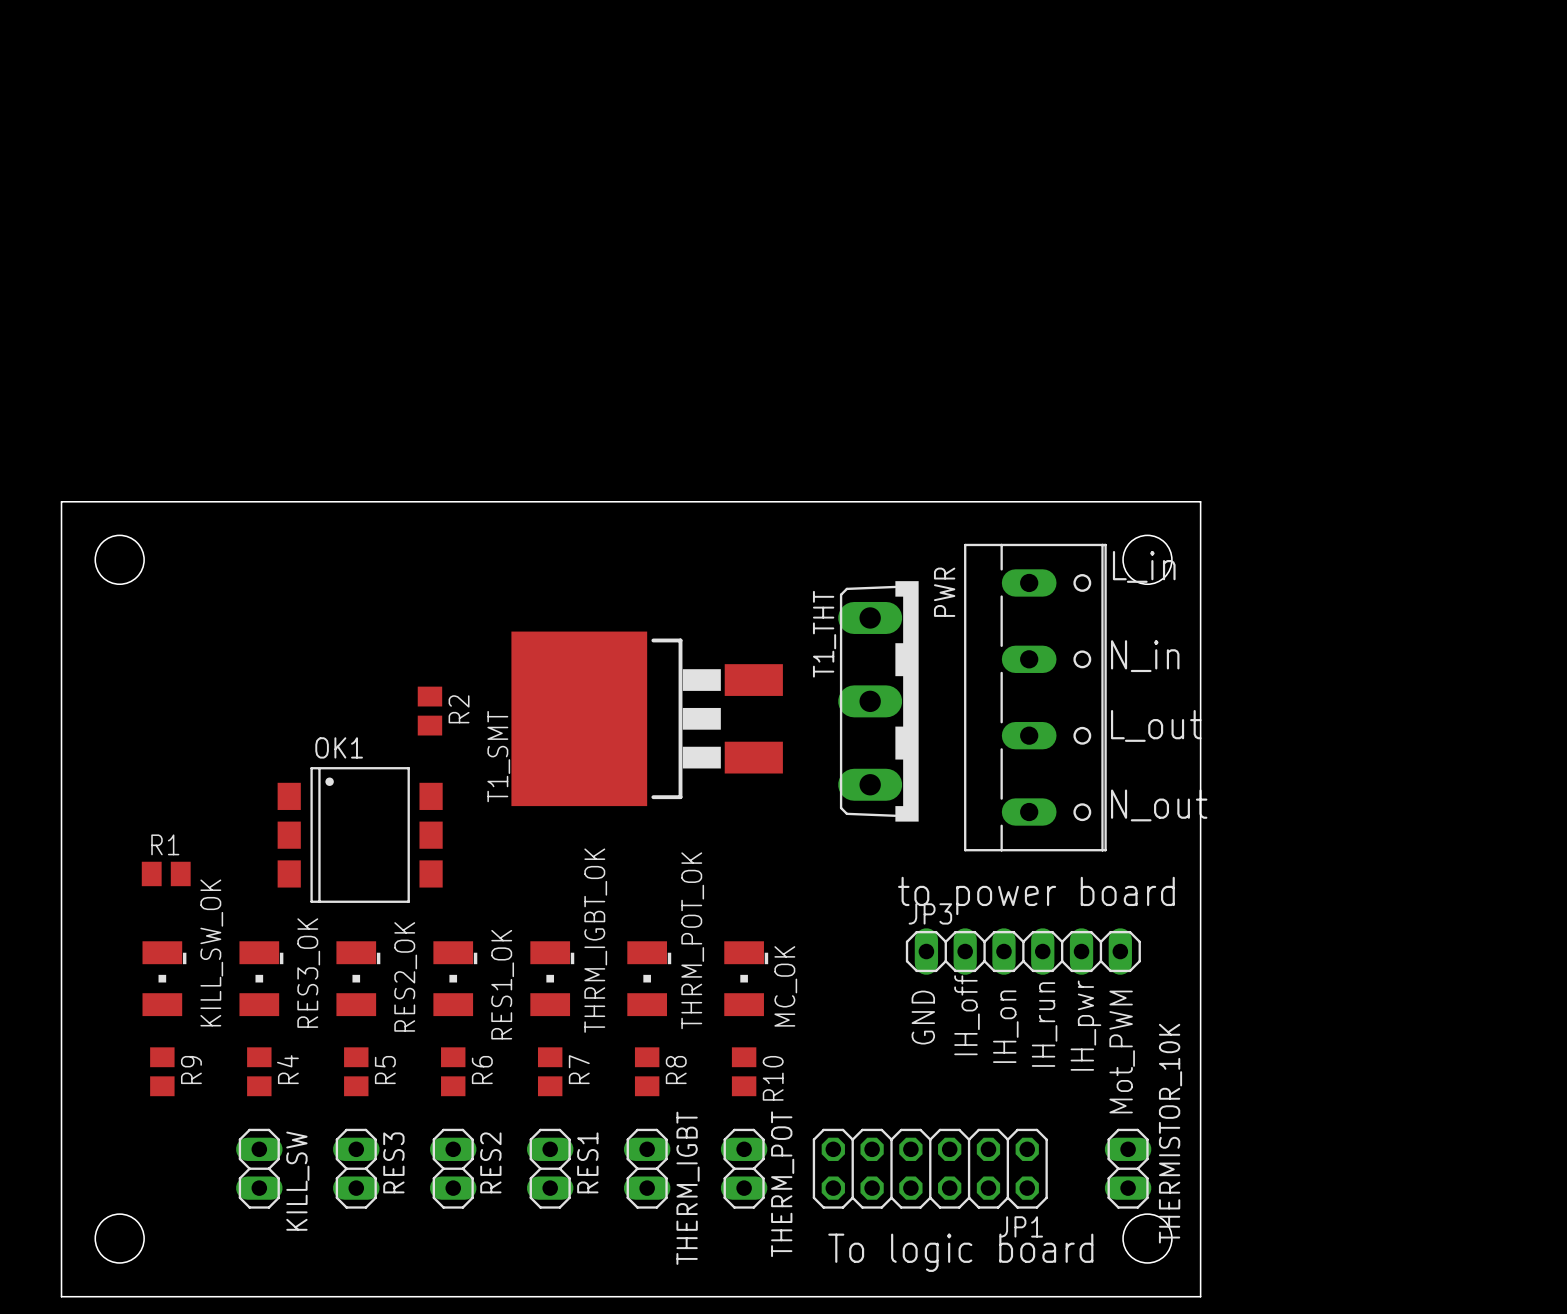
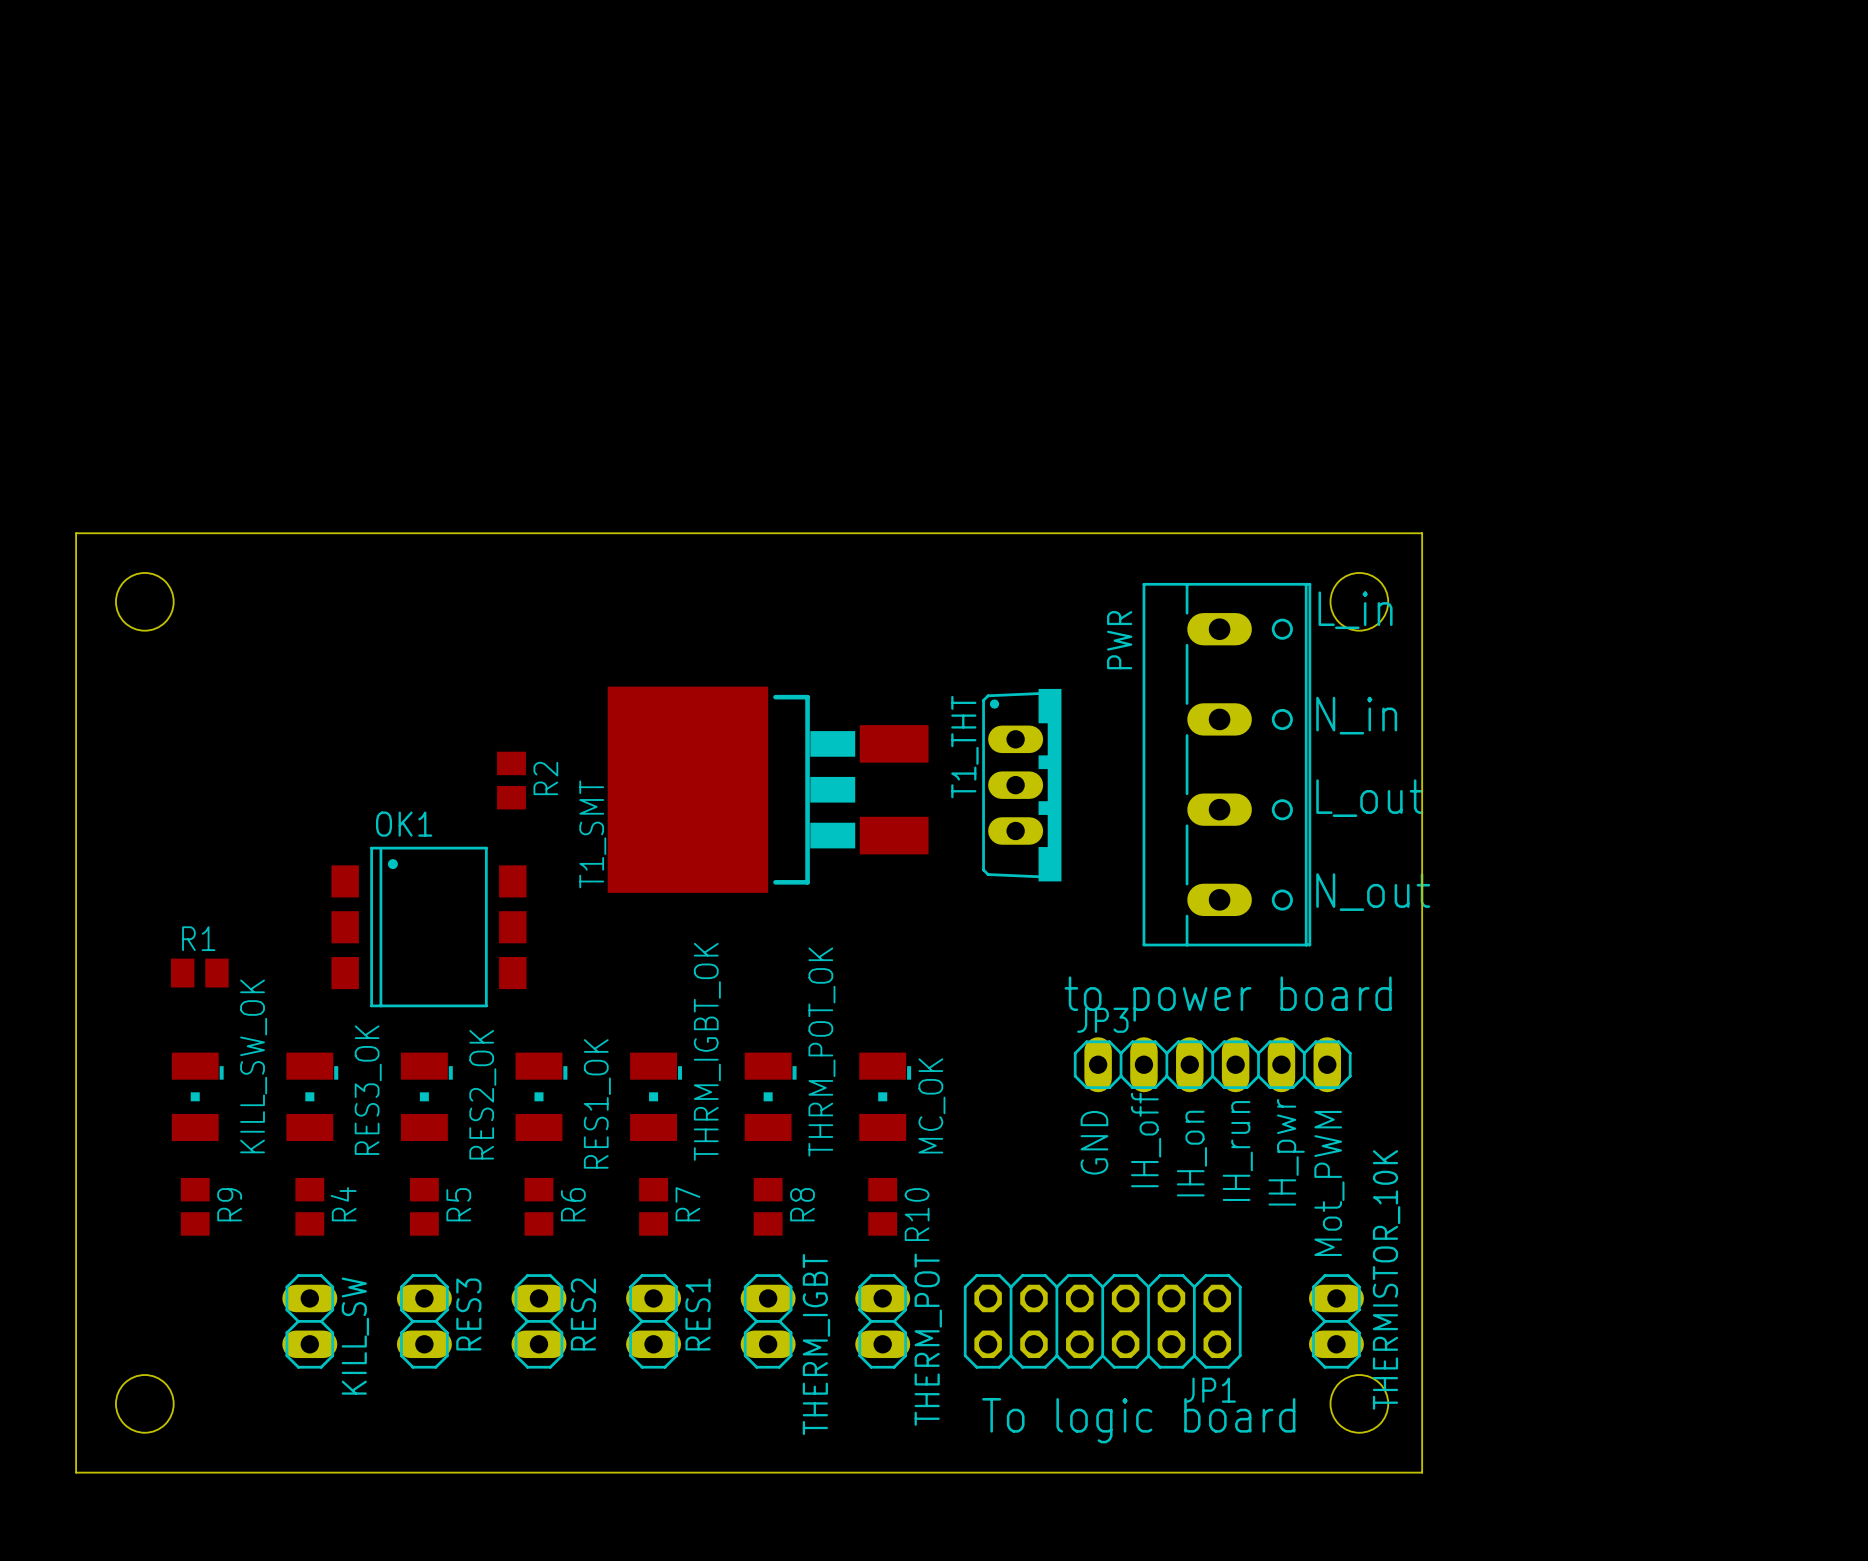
T1_THT footprint: [838, 581, 919, 822] -> [982, 688, 1062, 882]
T1_THT name position: T1_THT (824, 634) -> T1_THT (964, 747)

